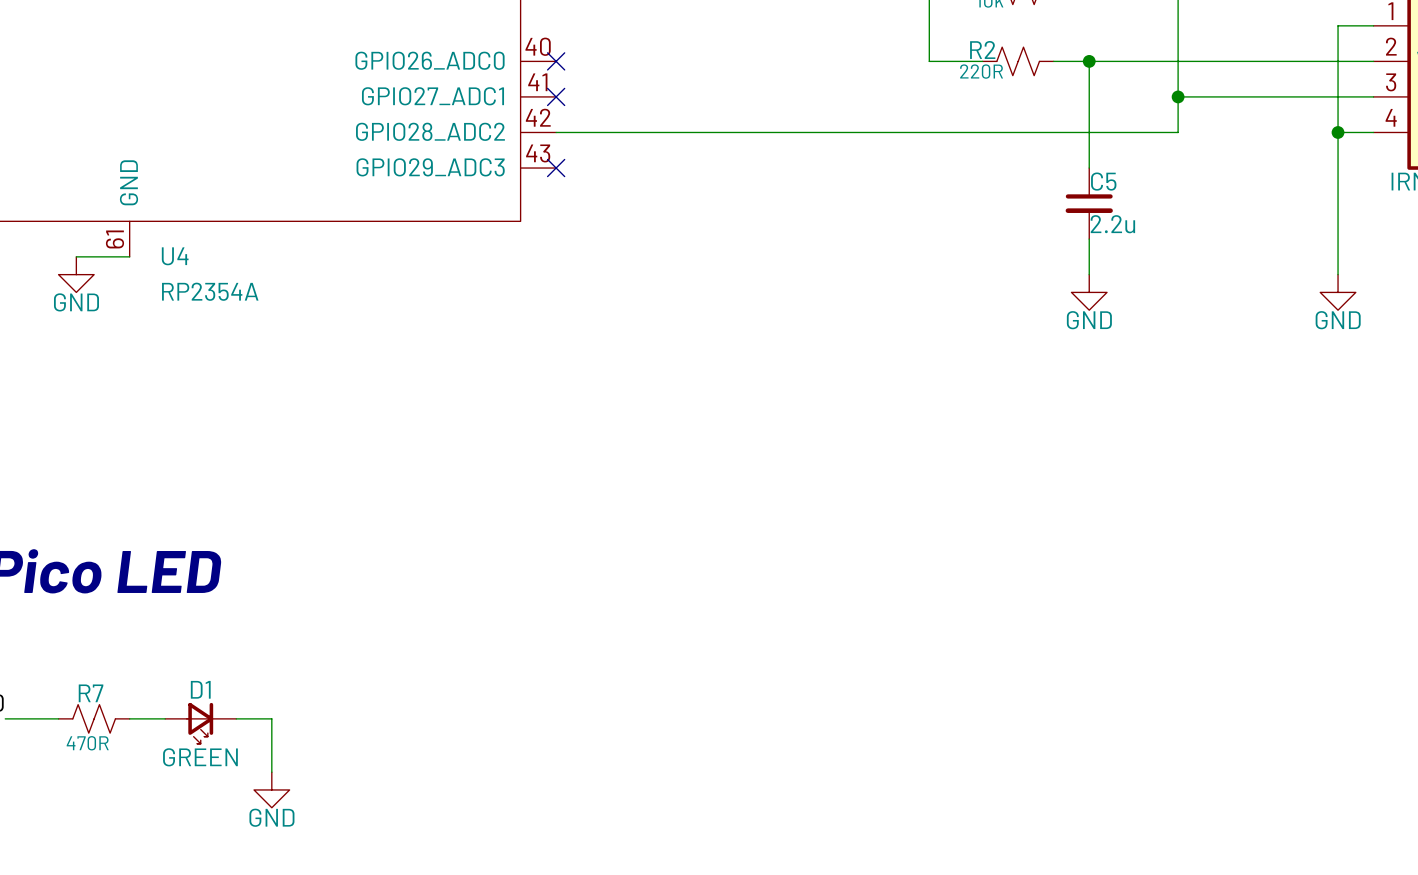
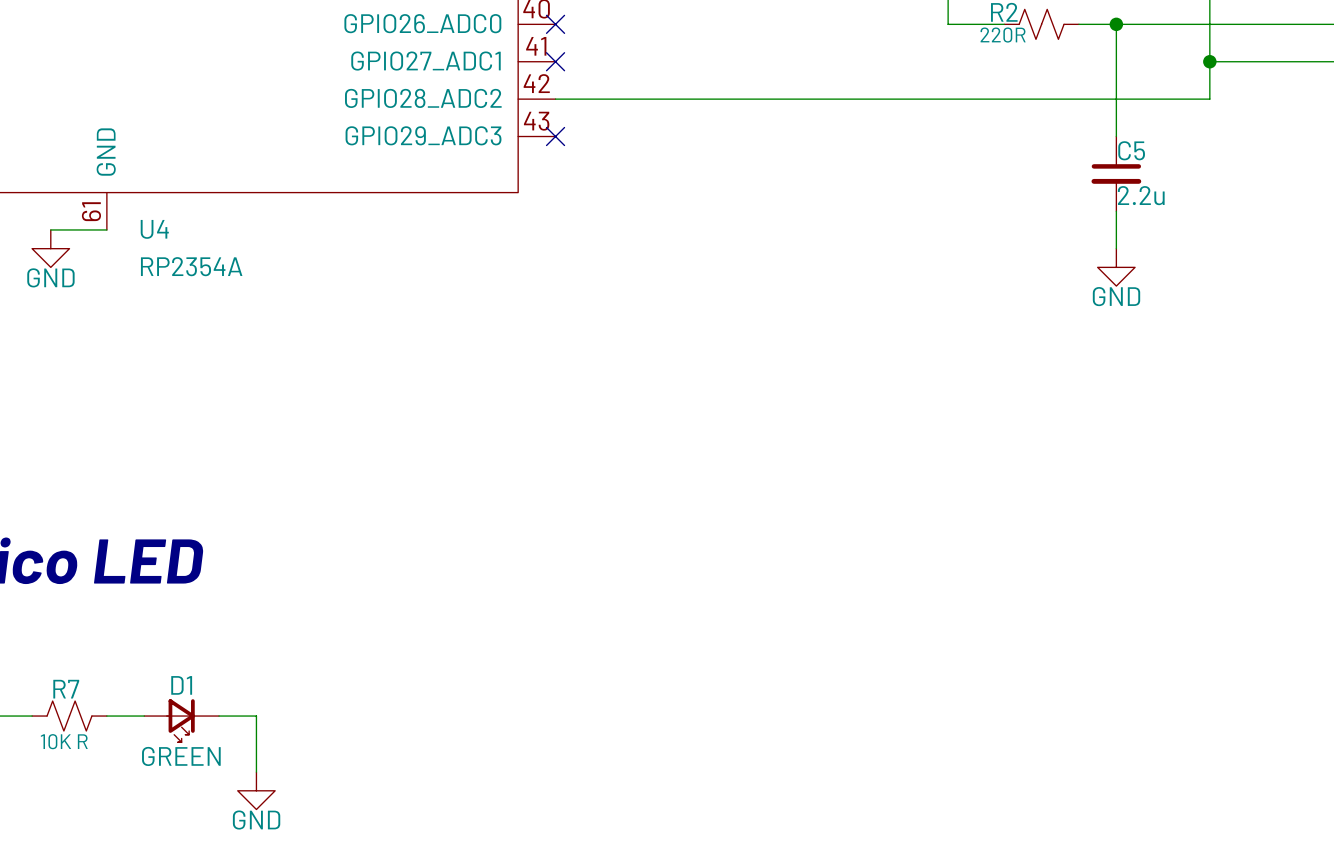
R7 value: 470R (87, 743) -> 10K R (64, 741)

